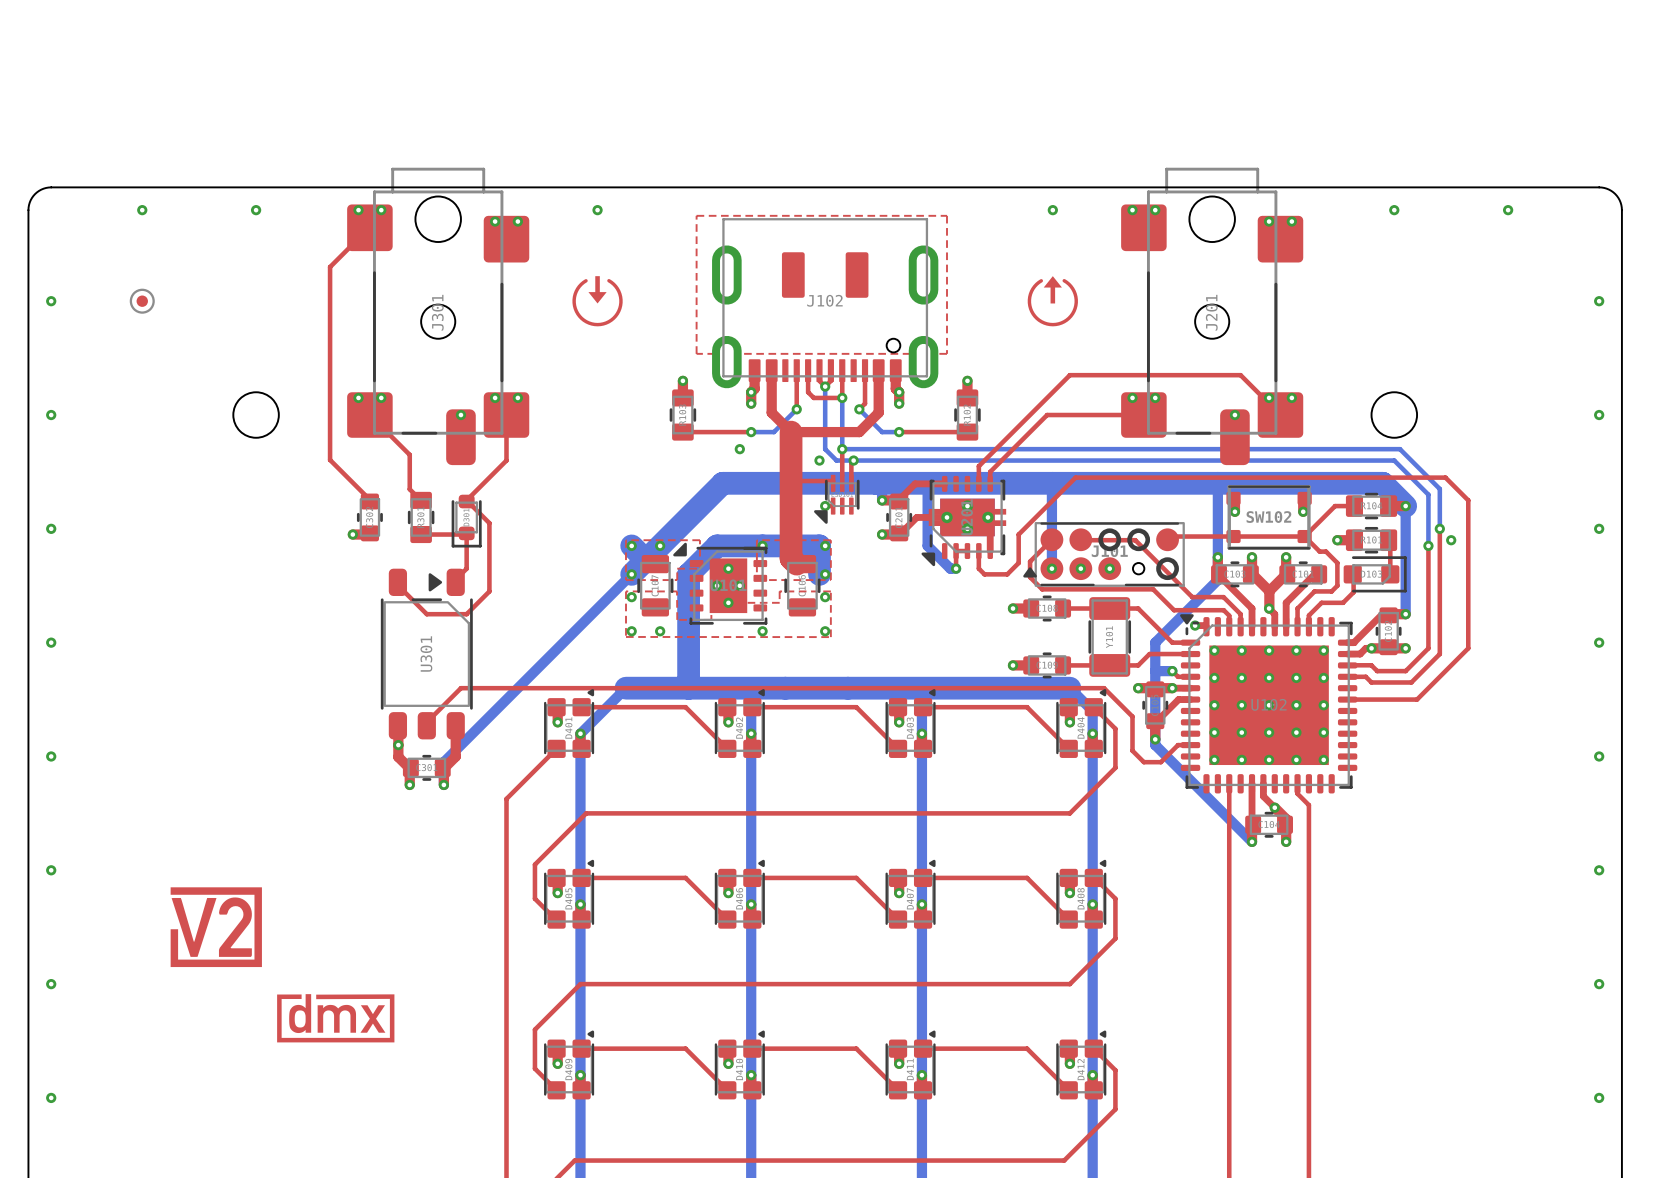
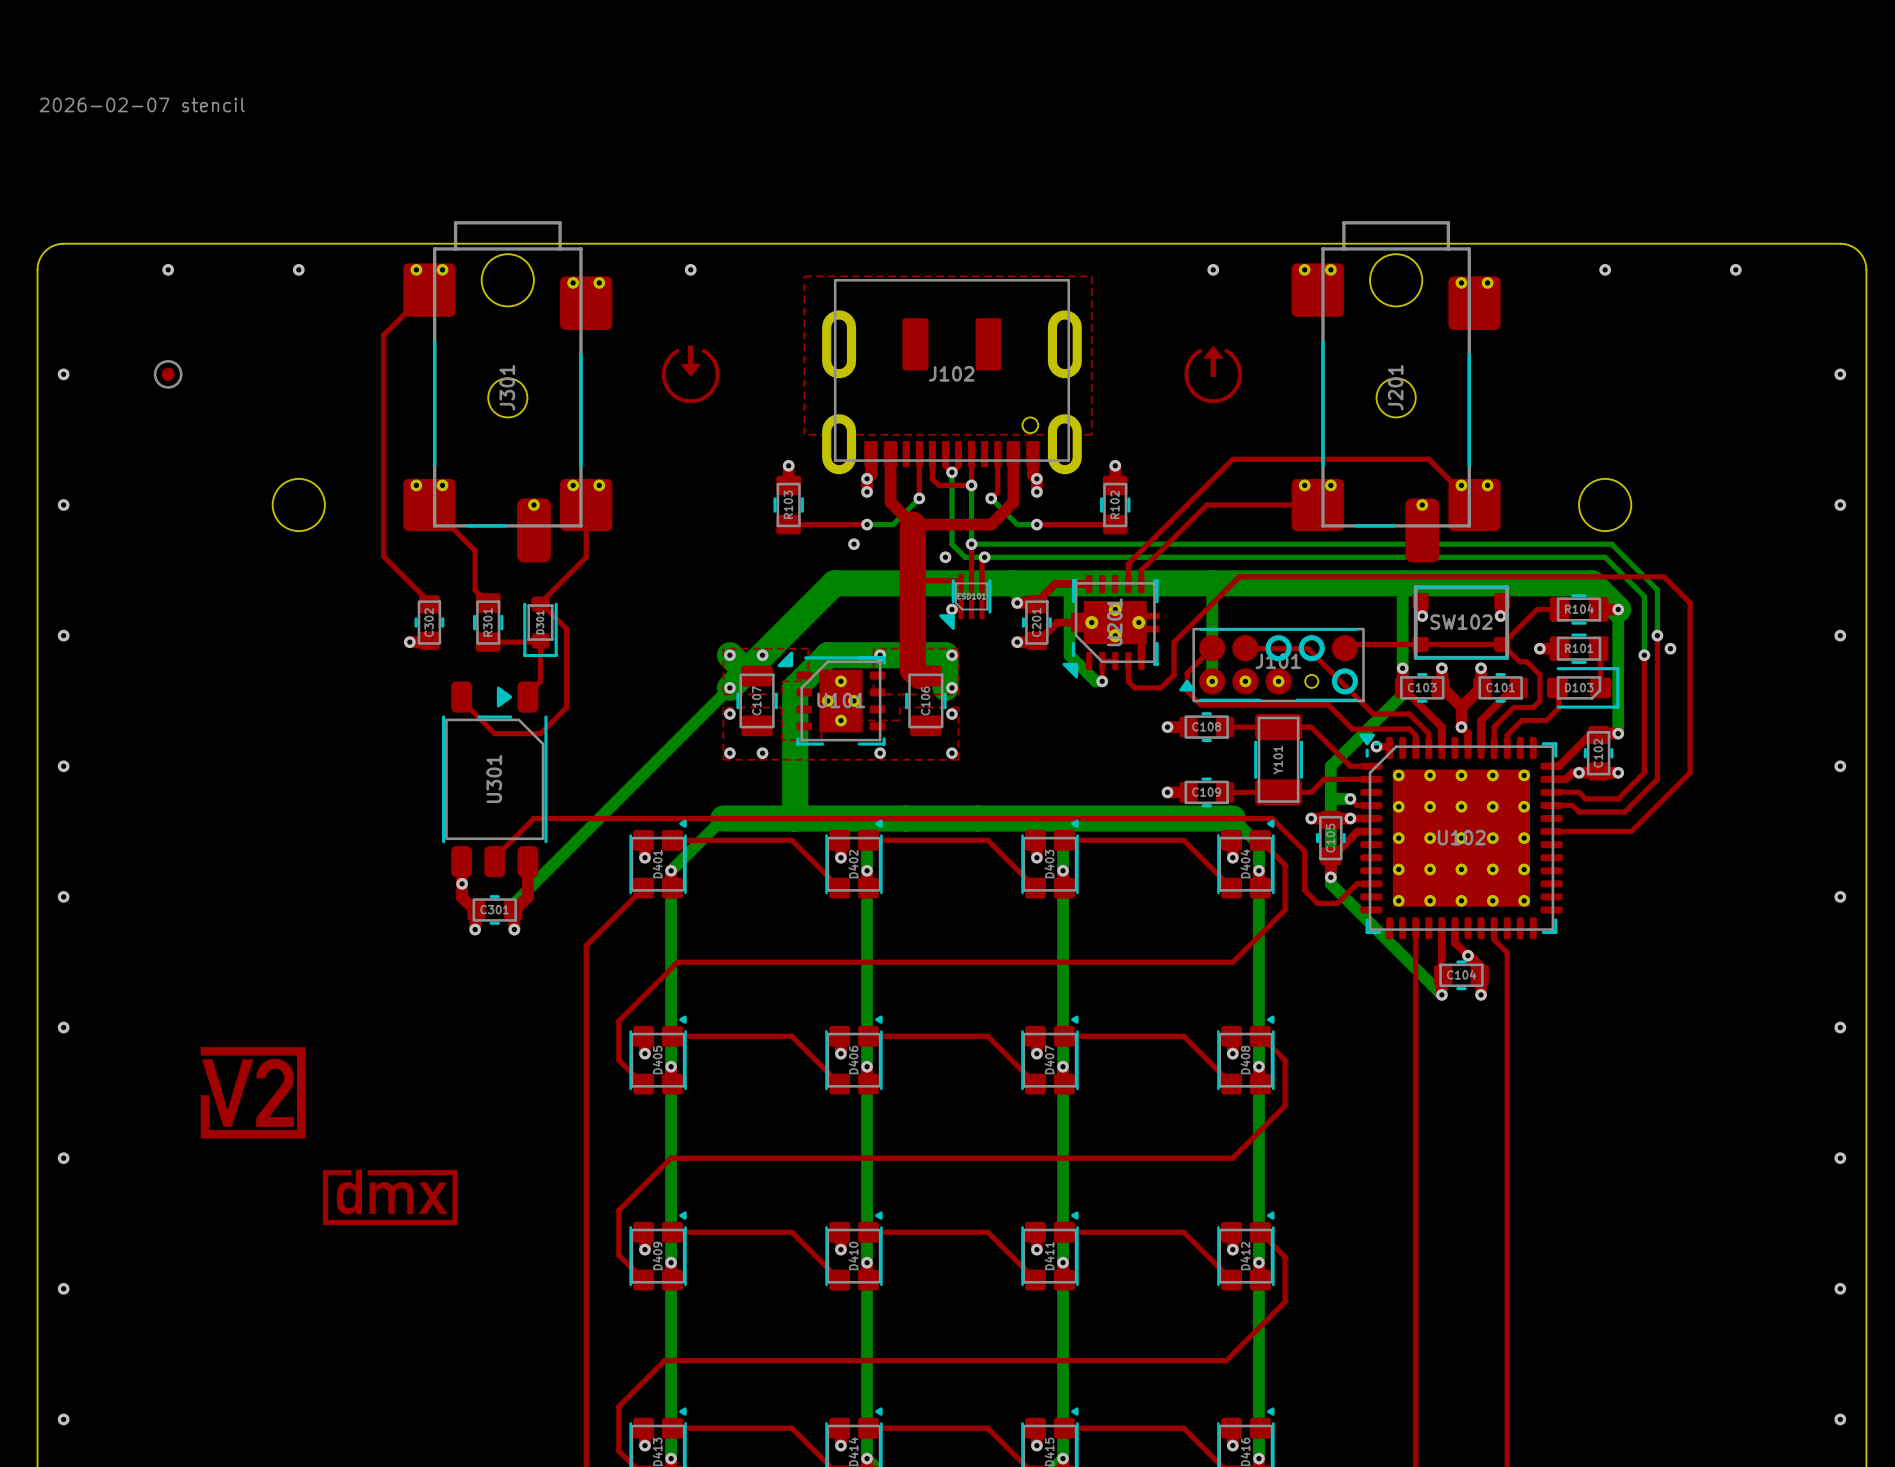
text: none -> 2026-02-07 stencil (142, 104)

